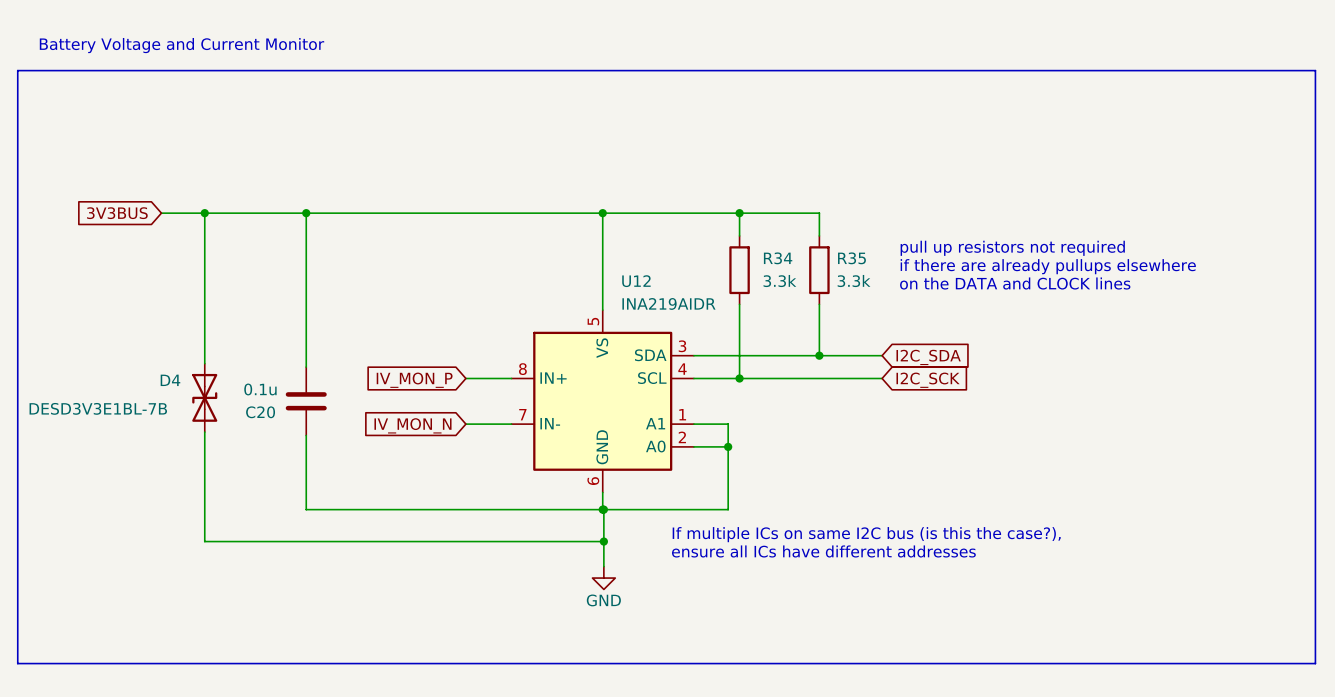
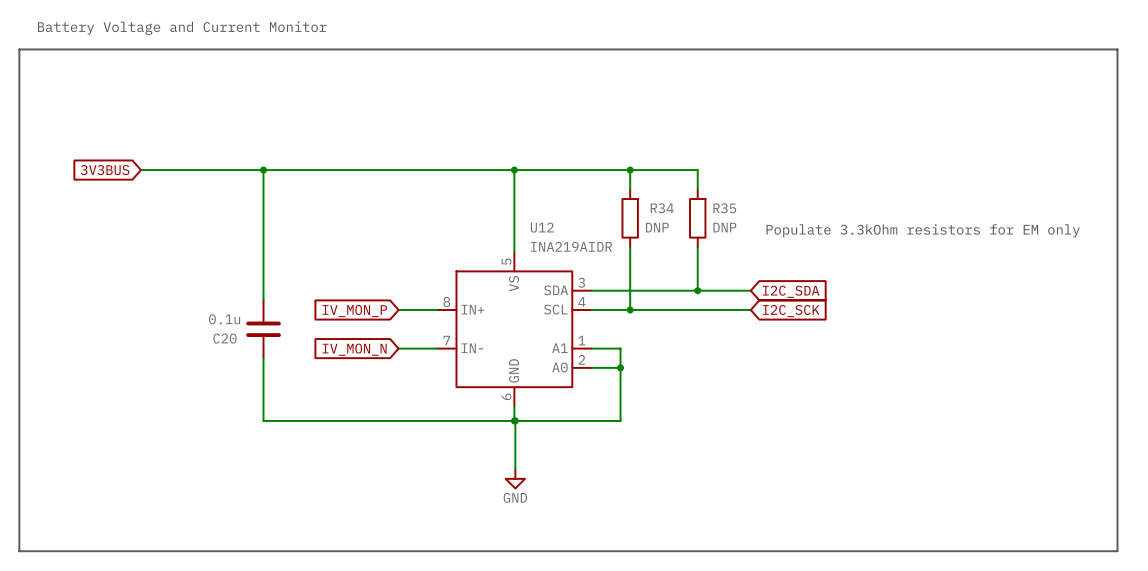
wire: (204, 213) (204, 363) -> none
junction: (204, 213) -> none
text: pull up resistors not required (1012, 248) -> none
text: if there are already pullups elsewhere (1048, 266) -> none
R34 value: 3.3k (779, 281) -> DNP (657, 227)
R35 value: 3.3k (854, 281) -> DNP (724, 227)
text: on the DATA and CLOCK lines (1015, 283) -> Populate 3.3kOhm resistors for EM only (923, 230)
D4: DESD3V3E1BL-7B (204, 397) -> none
wire: (204, 432) (204, 541) (603, 541) -> none
text: If multiple ICs on same I2C bus (is this the case?), (866, 534) -> none
junction: (603, 541) -> none
text: ensure all ICs have different addresses (823, 551) -> none

